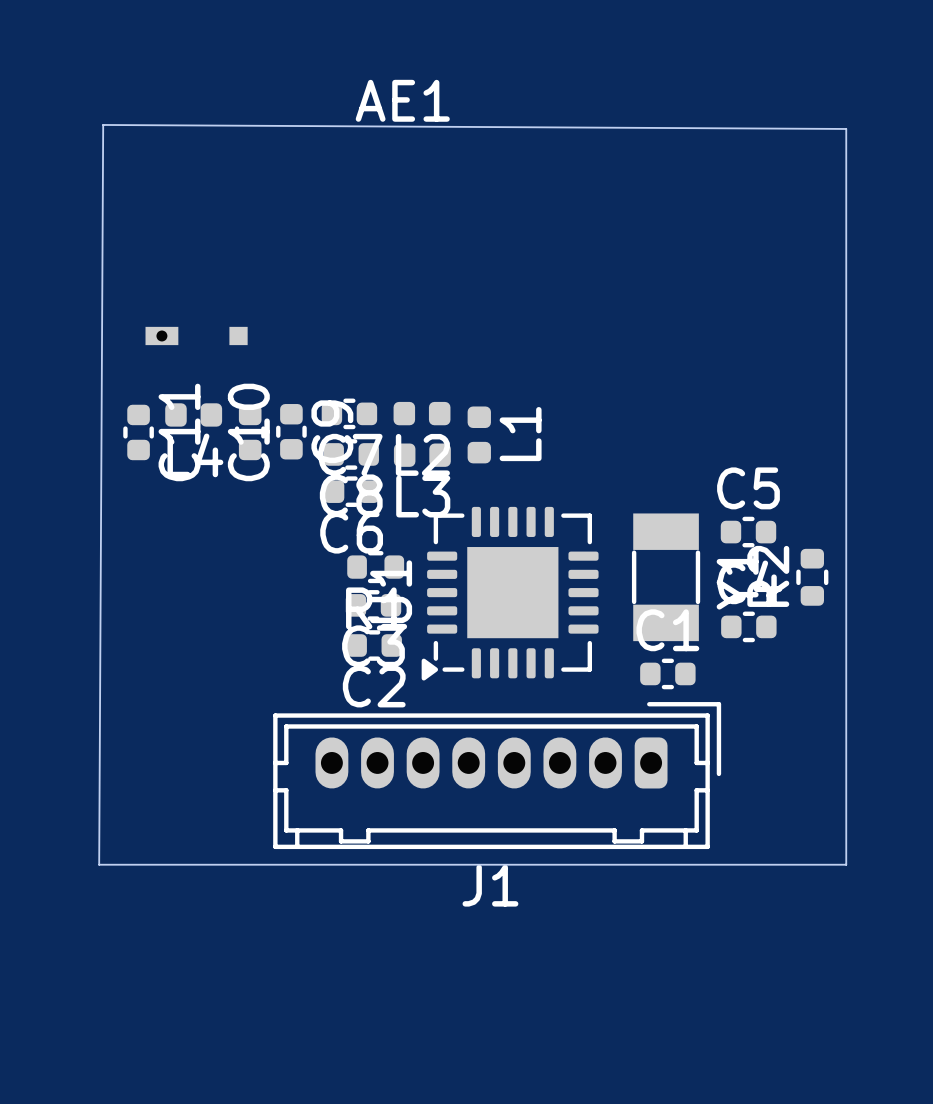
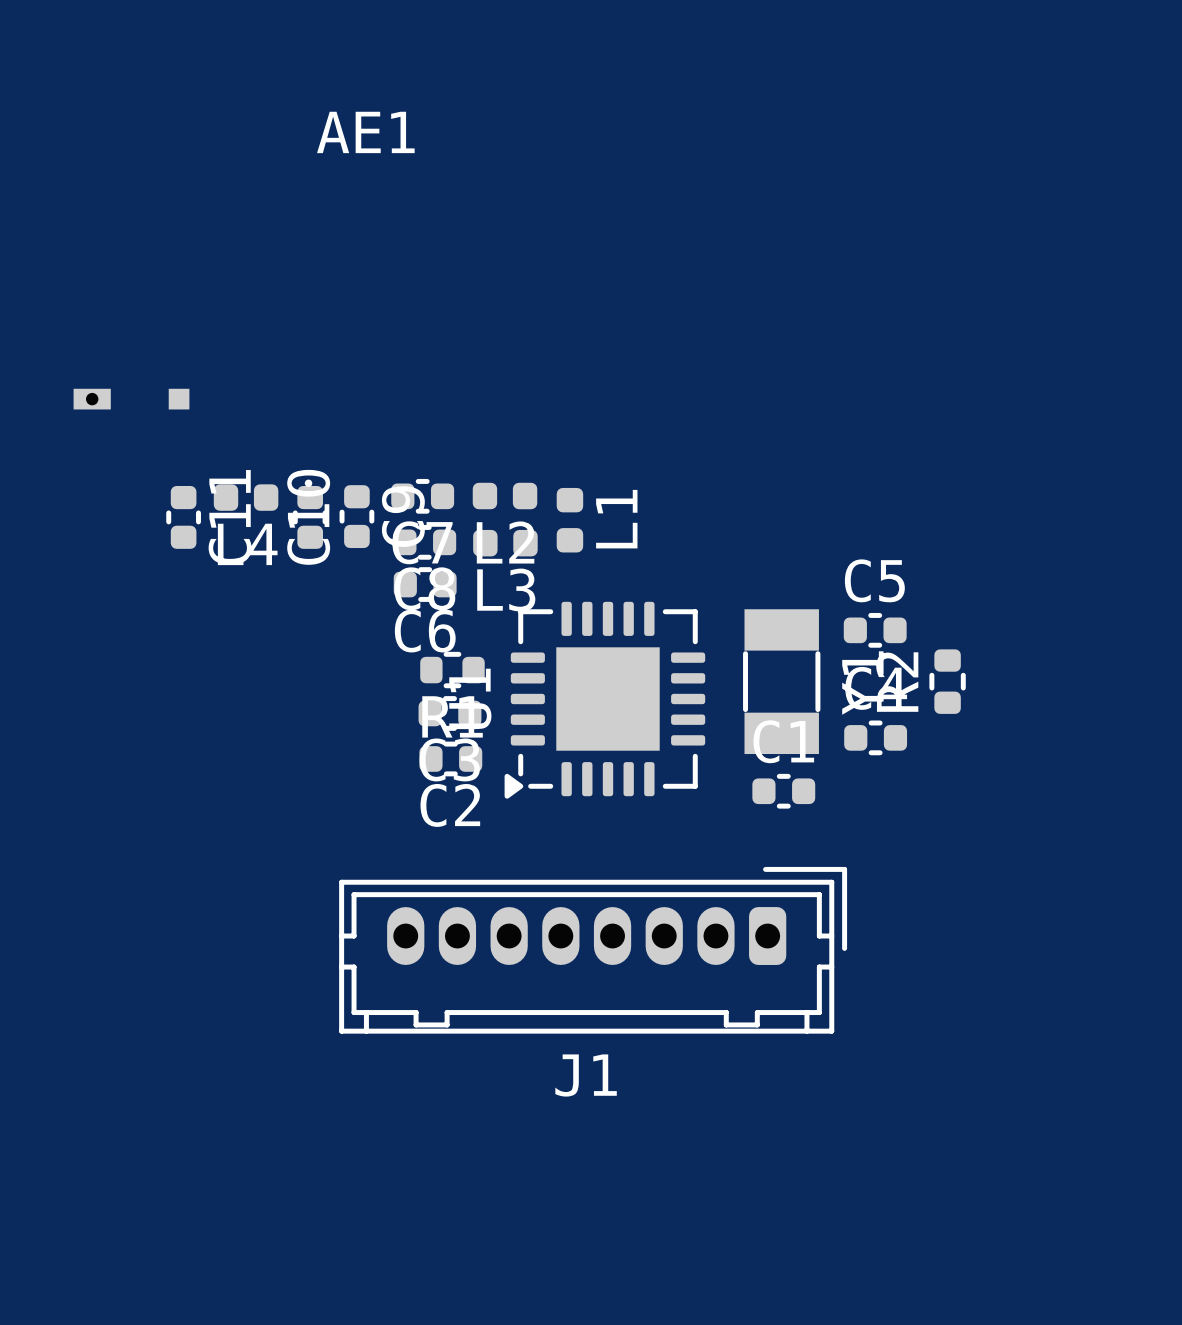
board edge: (103, 124) (846, 128) (846, 864) (99, 864) (103, 124) -> none
AE1 position: (196, 335) -> (131, 399)
J1 position: (497, 775) -> (593, 950)

